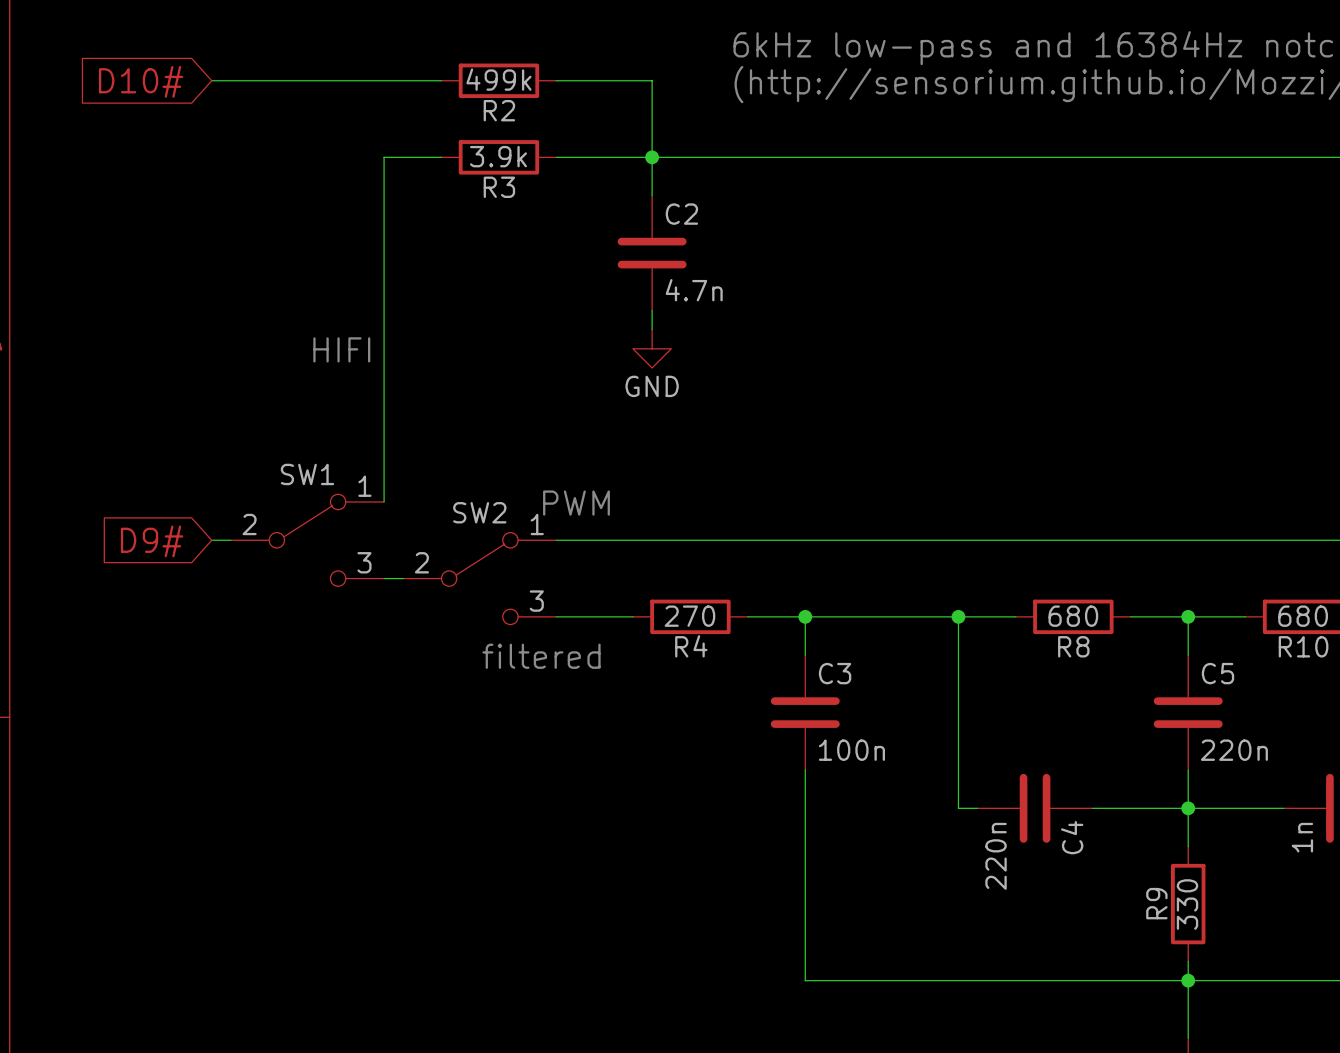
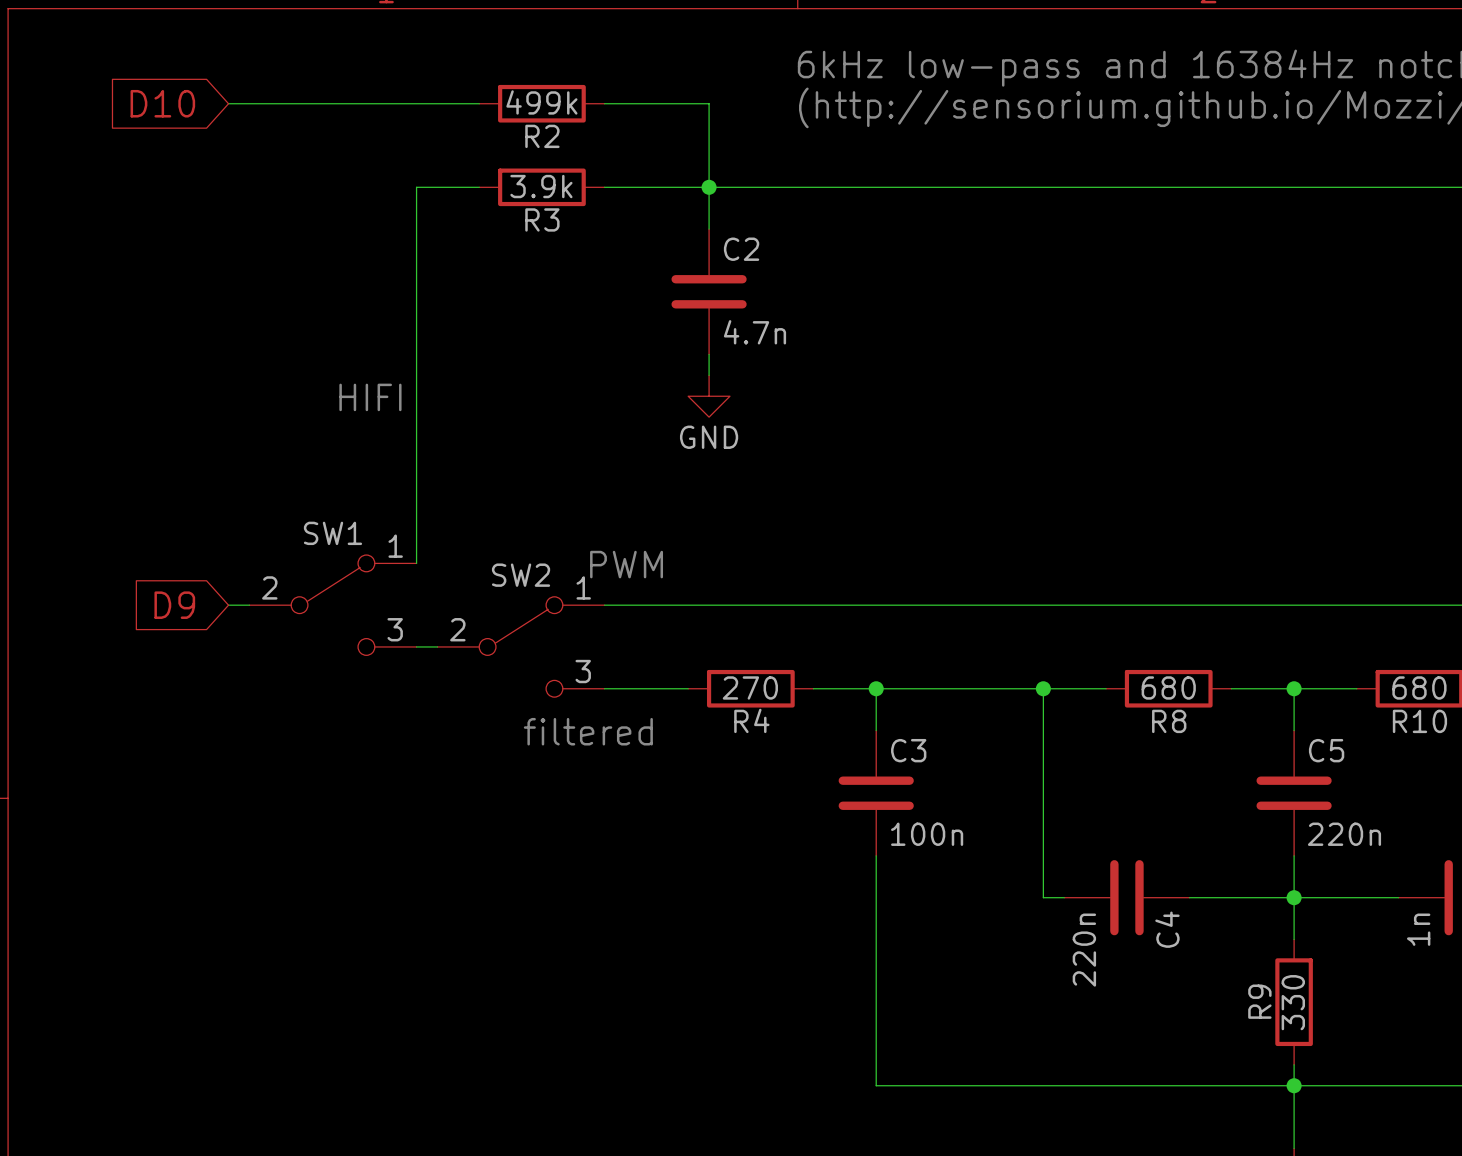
global label: D10# (141, 81) -> D10 (162, 103)
global label: D9# (152, 541) -> D9 (174, 605)

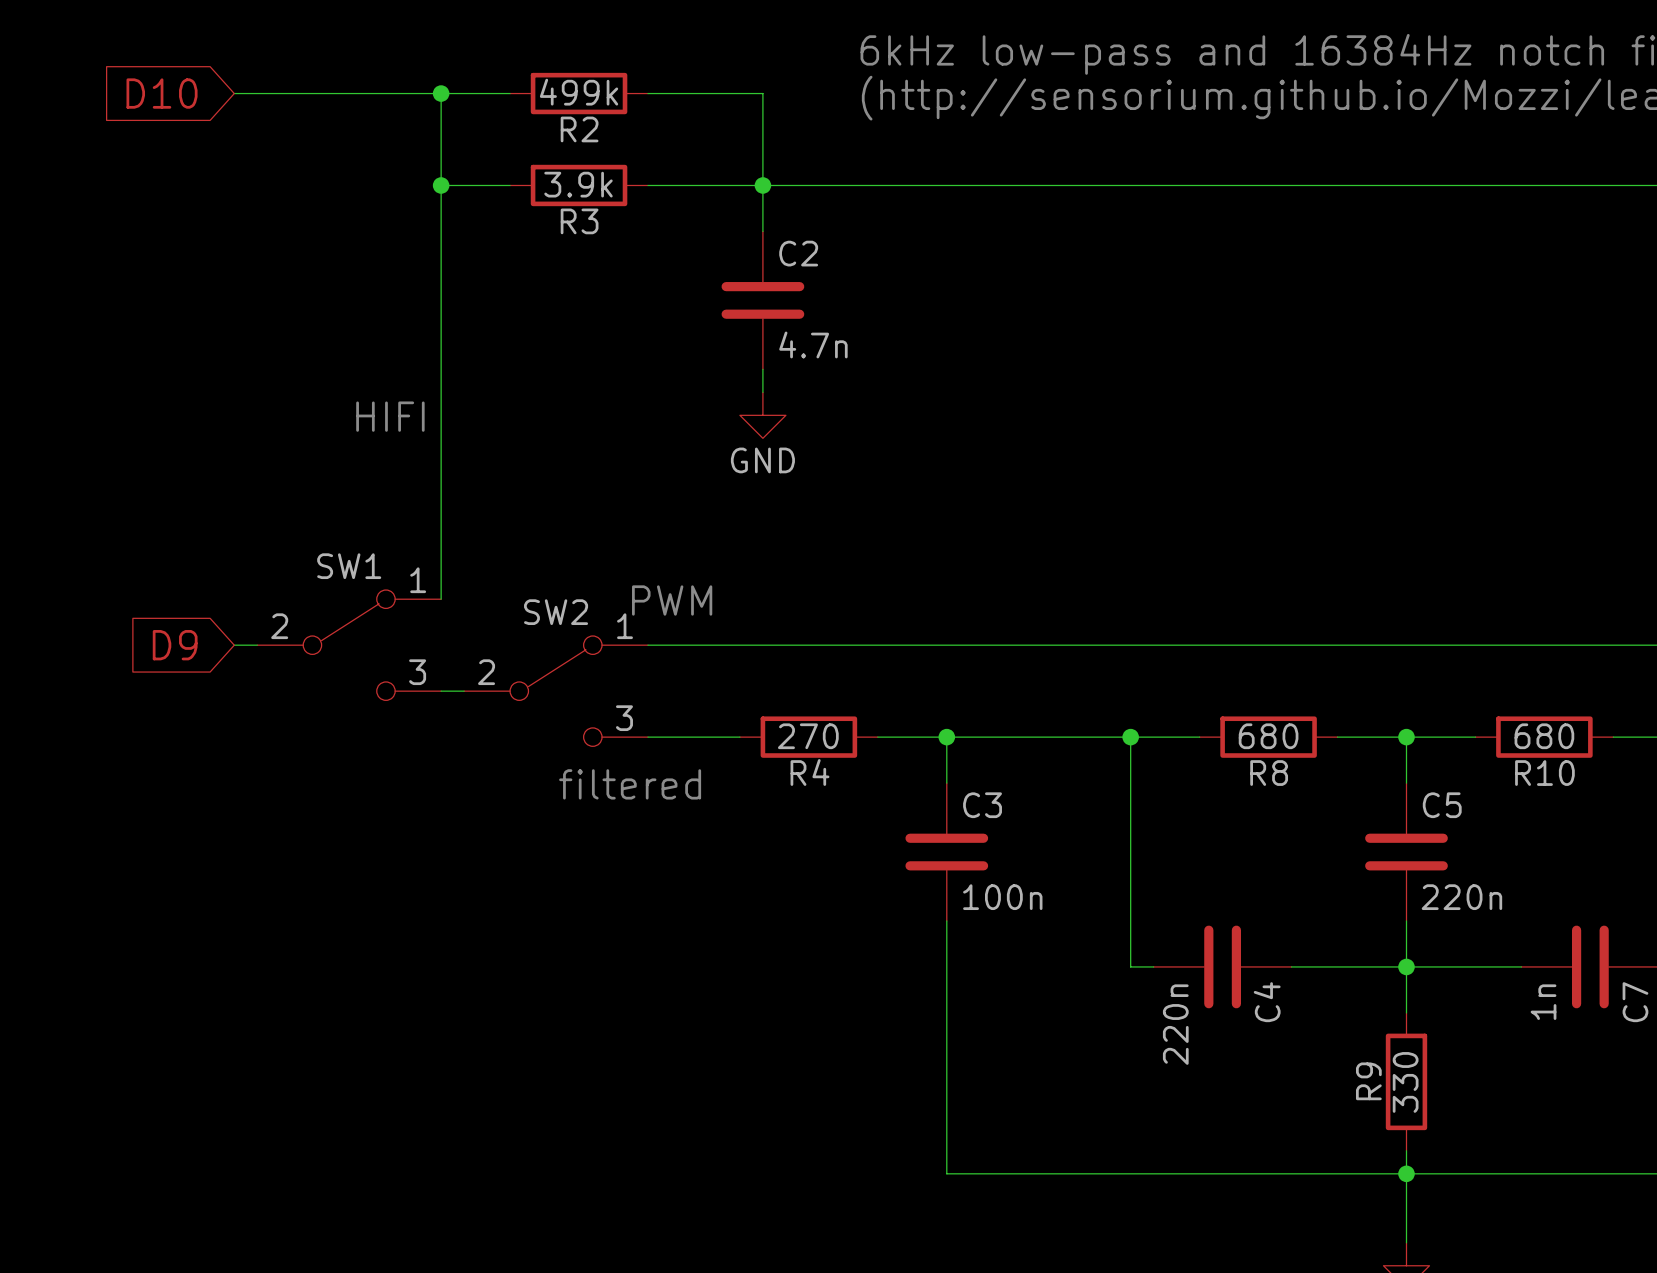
wire: none -> (441, 93) (441, 185)
junction: none -> (441, 93)
junction: none -> (441, 185)

